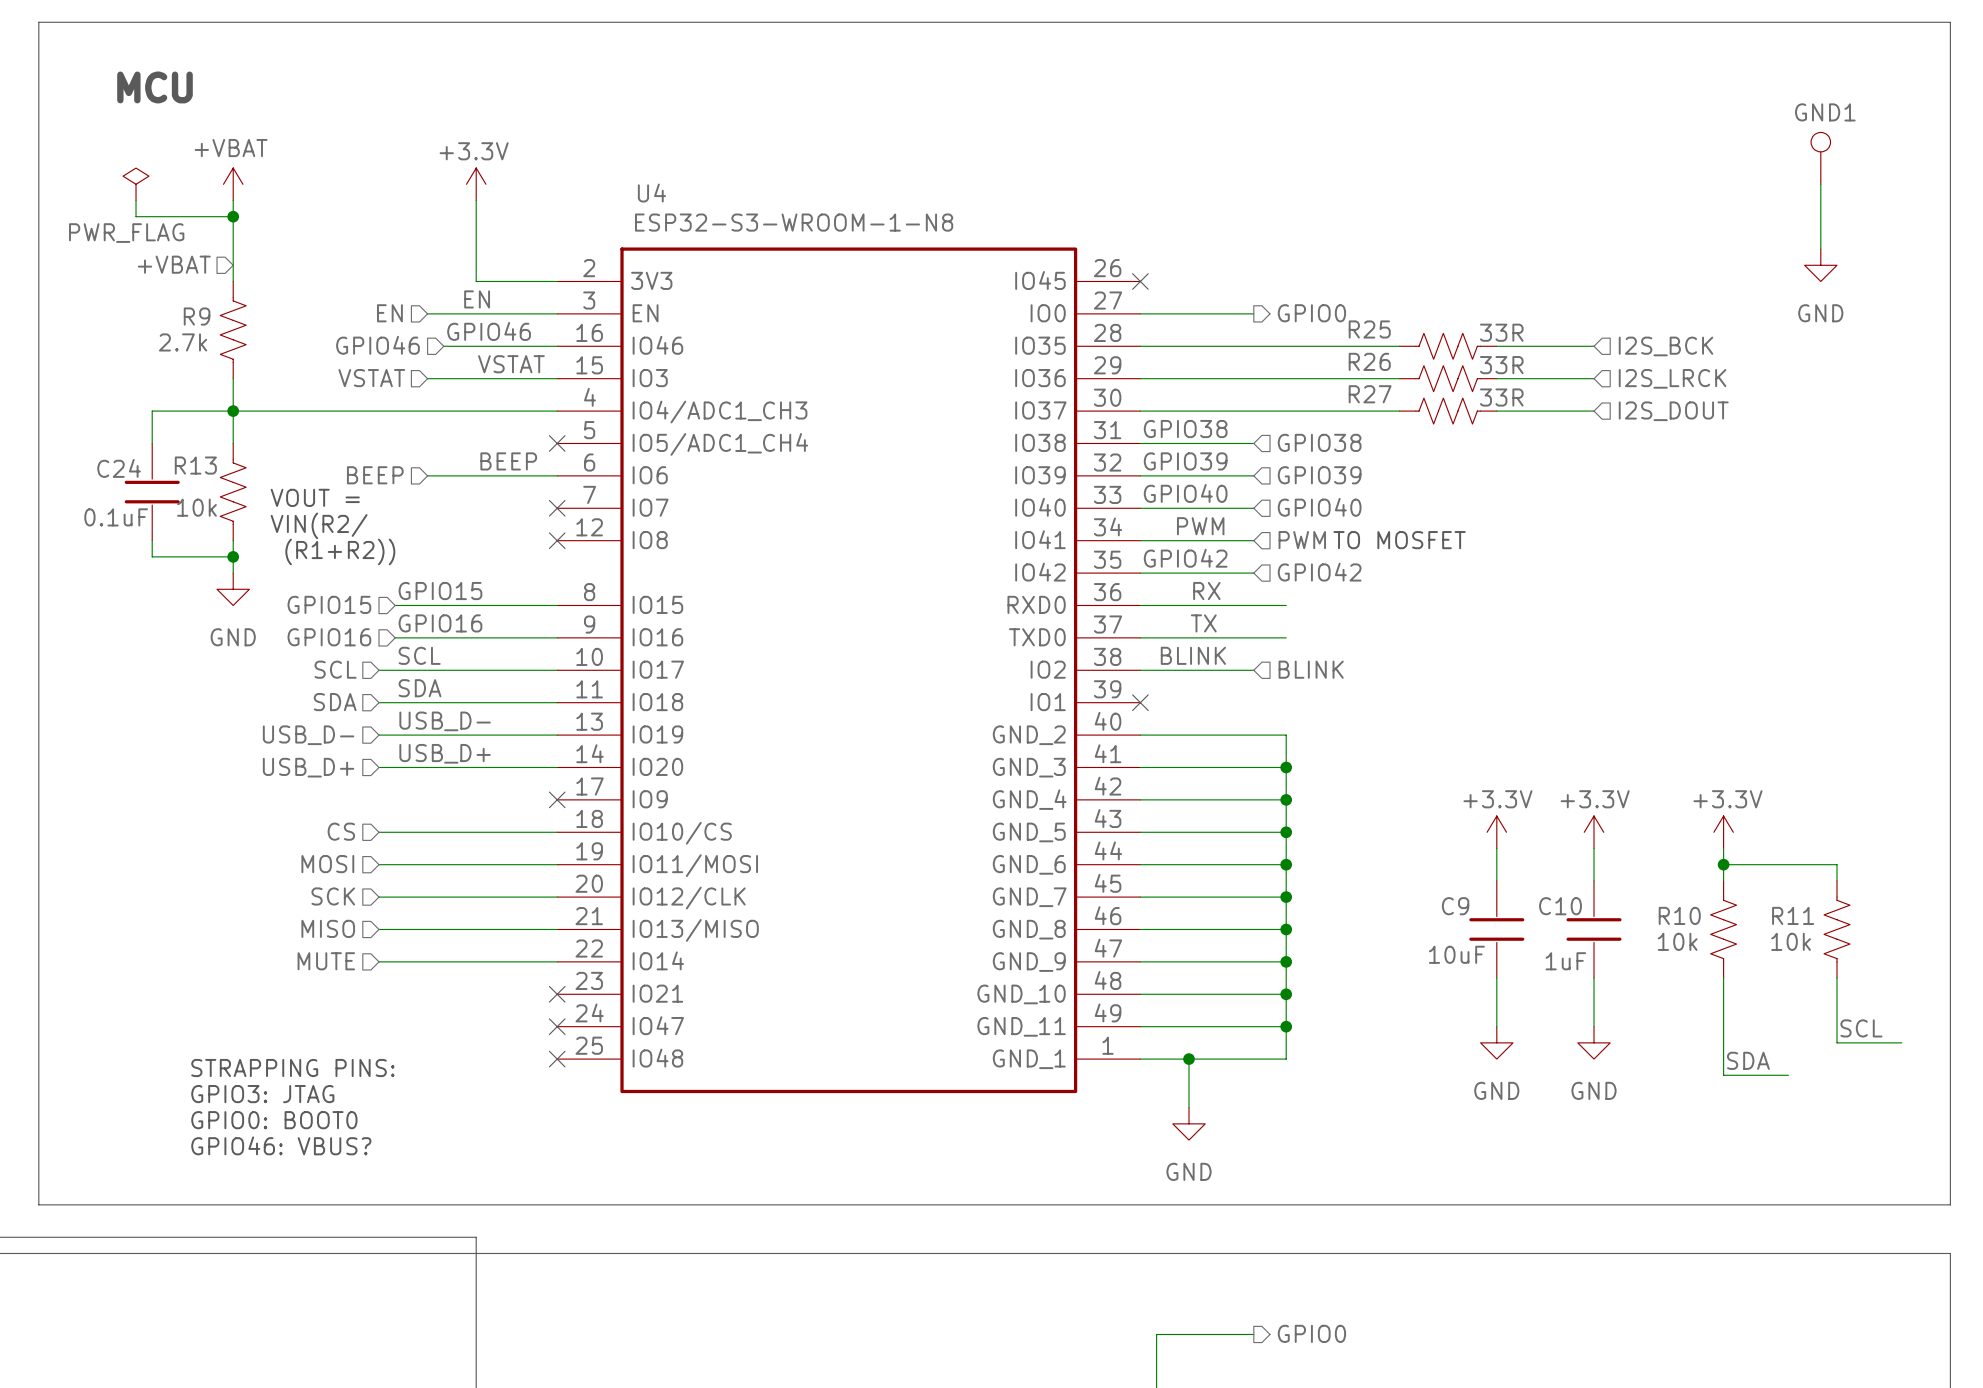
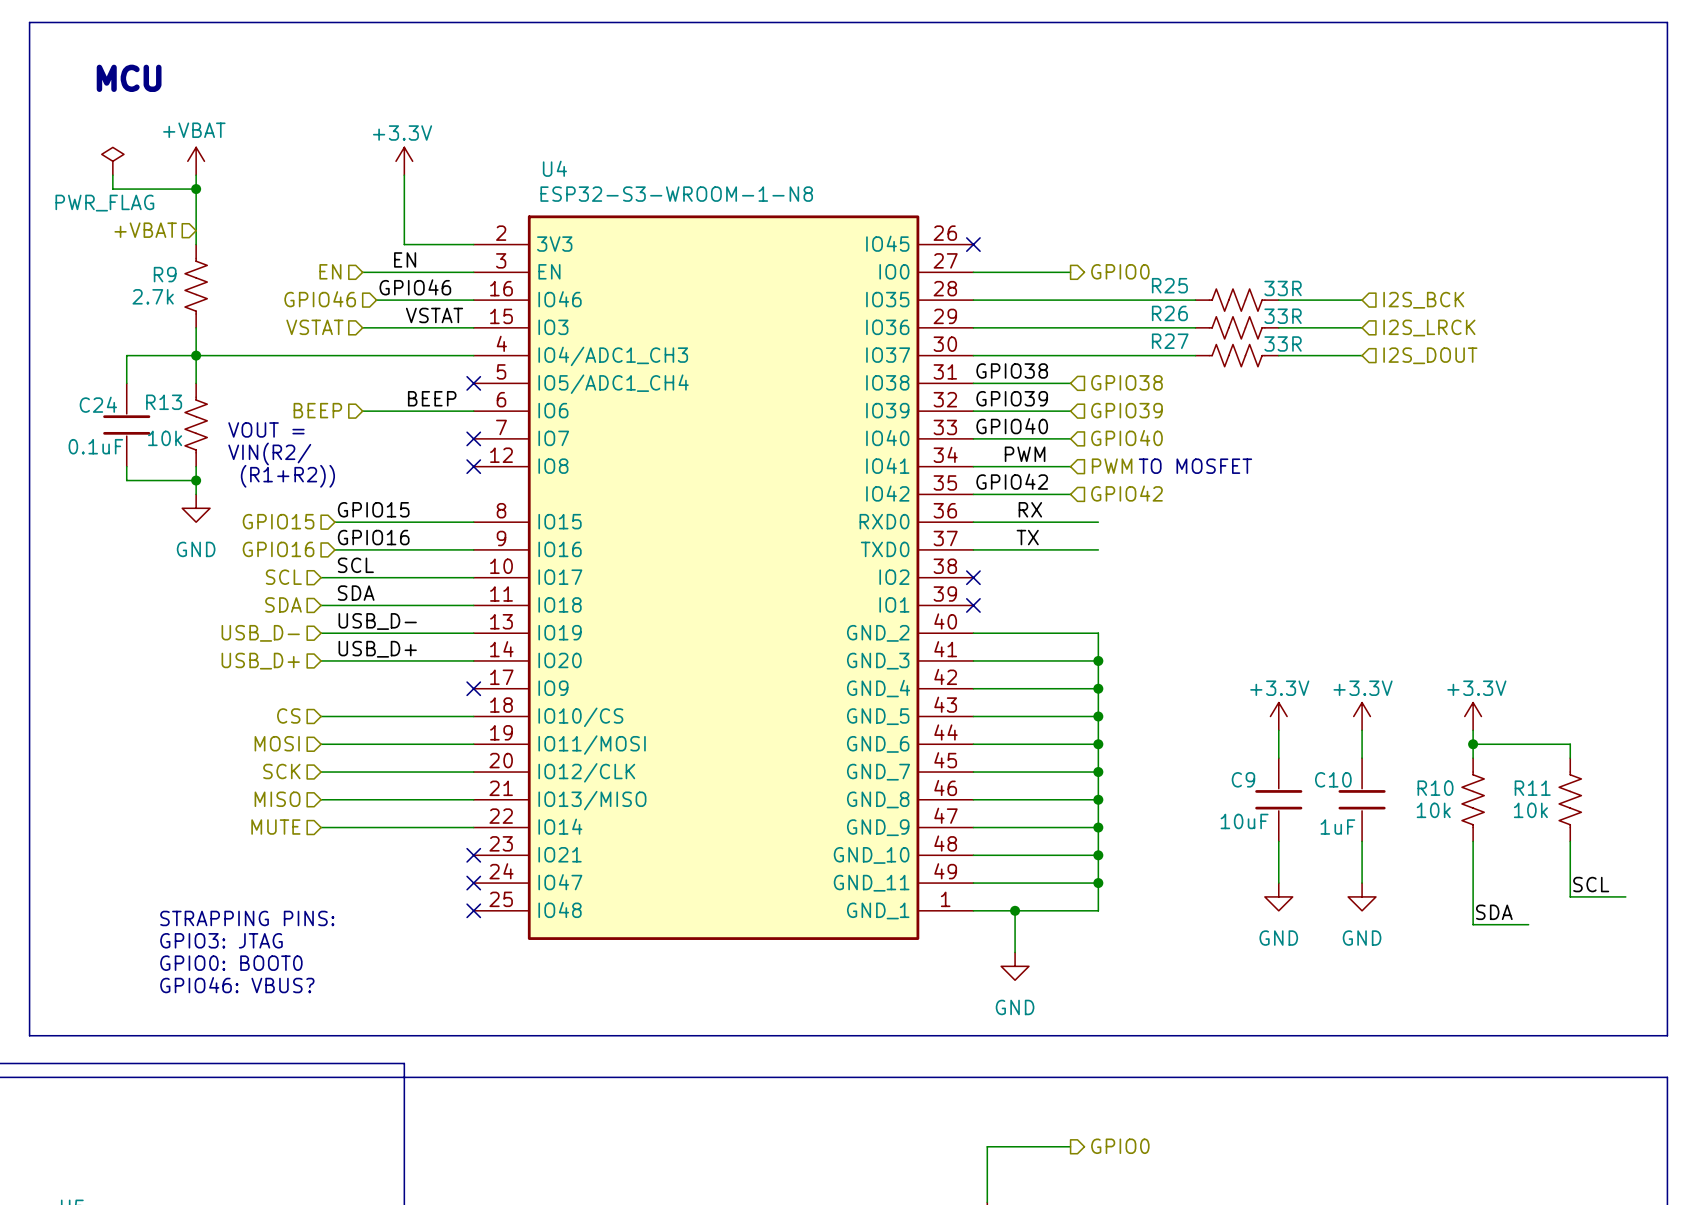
GND1: (1820, 158) -> none
wire: (1820, 184) (1820, 249) -> none
power symbol: GND (1820, 265) -> none
label: BLINK (1193, 655) -> none
hierarchical label: BLINK (1311, 669) -> none
wire: (1140, 670) (1253, 670) -> none
no-connect mark: none -> (973, 577)

